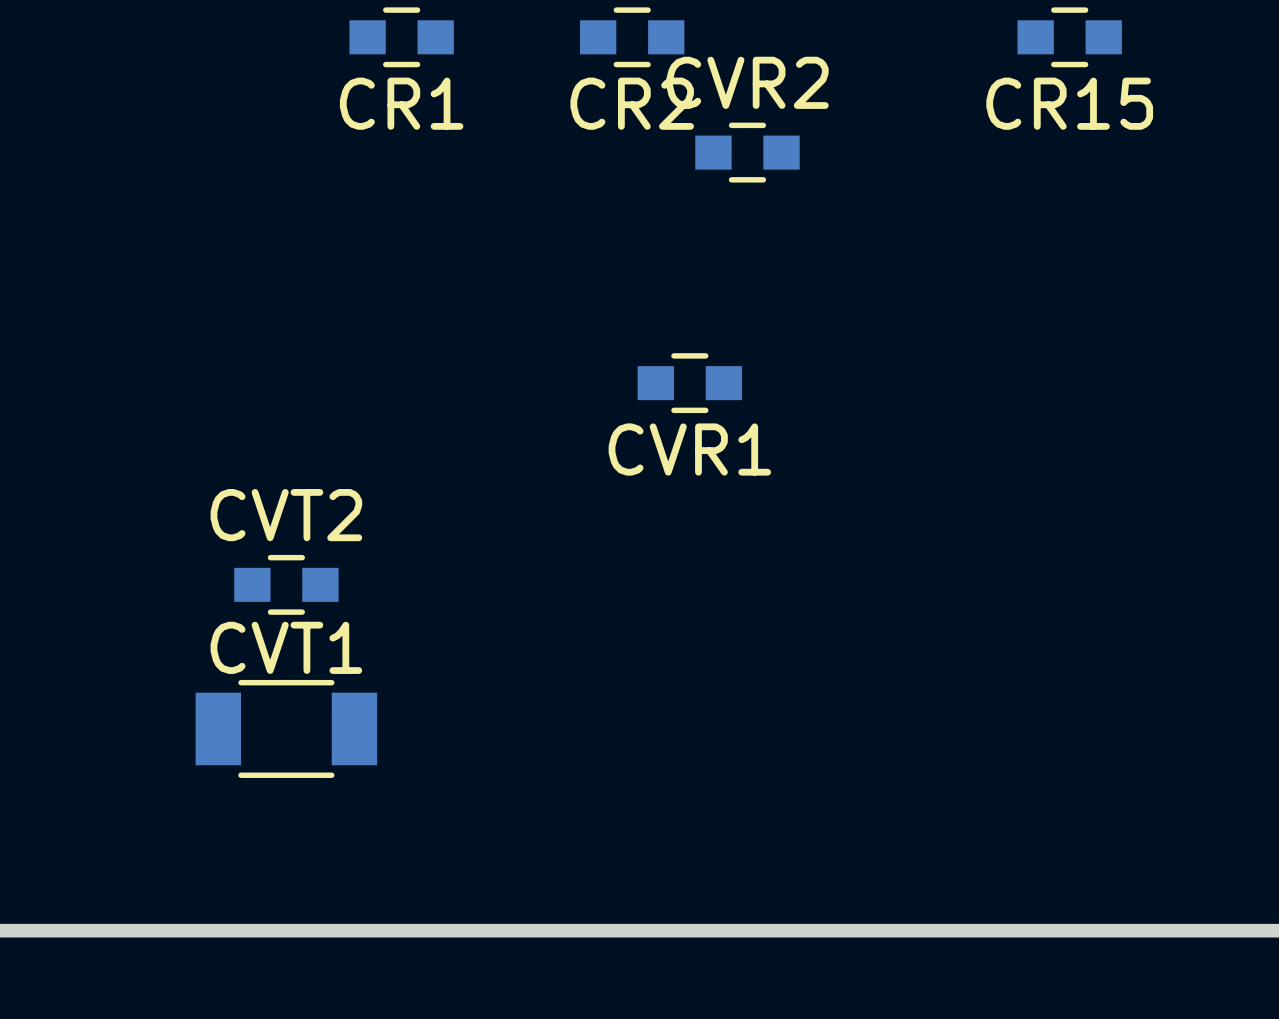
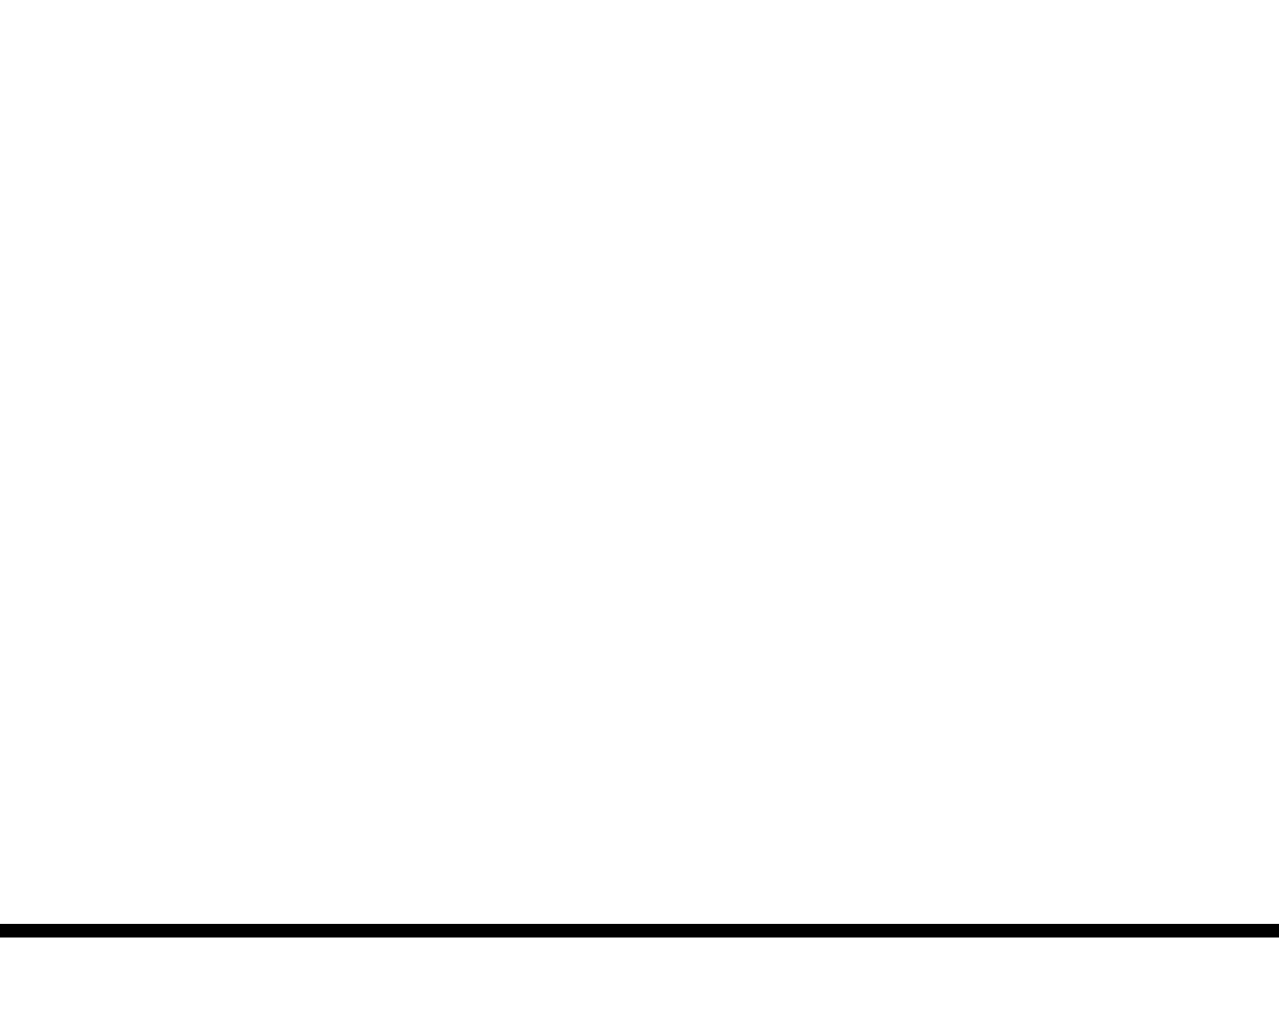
CR1: (401, 37) -> none
CR2: (632, 37) -> none
CR15: (1069, 37) -> none
CVR2: (747, 152) -> none
CVR1: (689, 383) -> none
CVT2: (286, 584) -> none
CVT1: (286, 728) -> none

